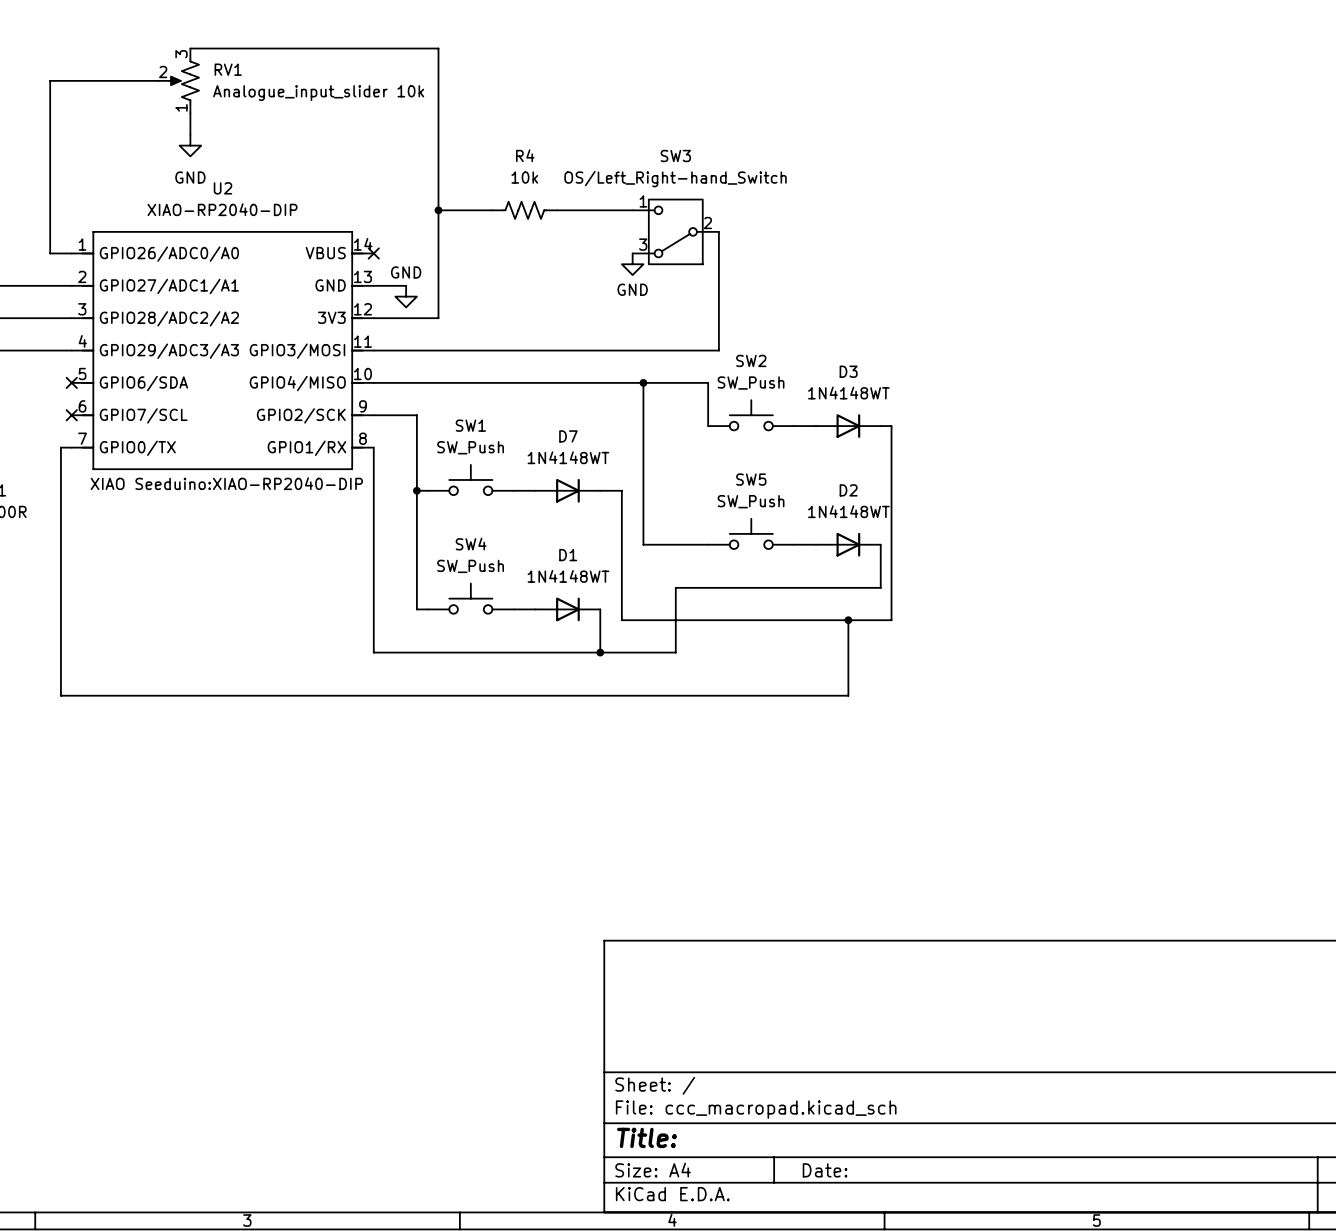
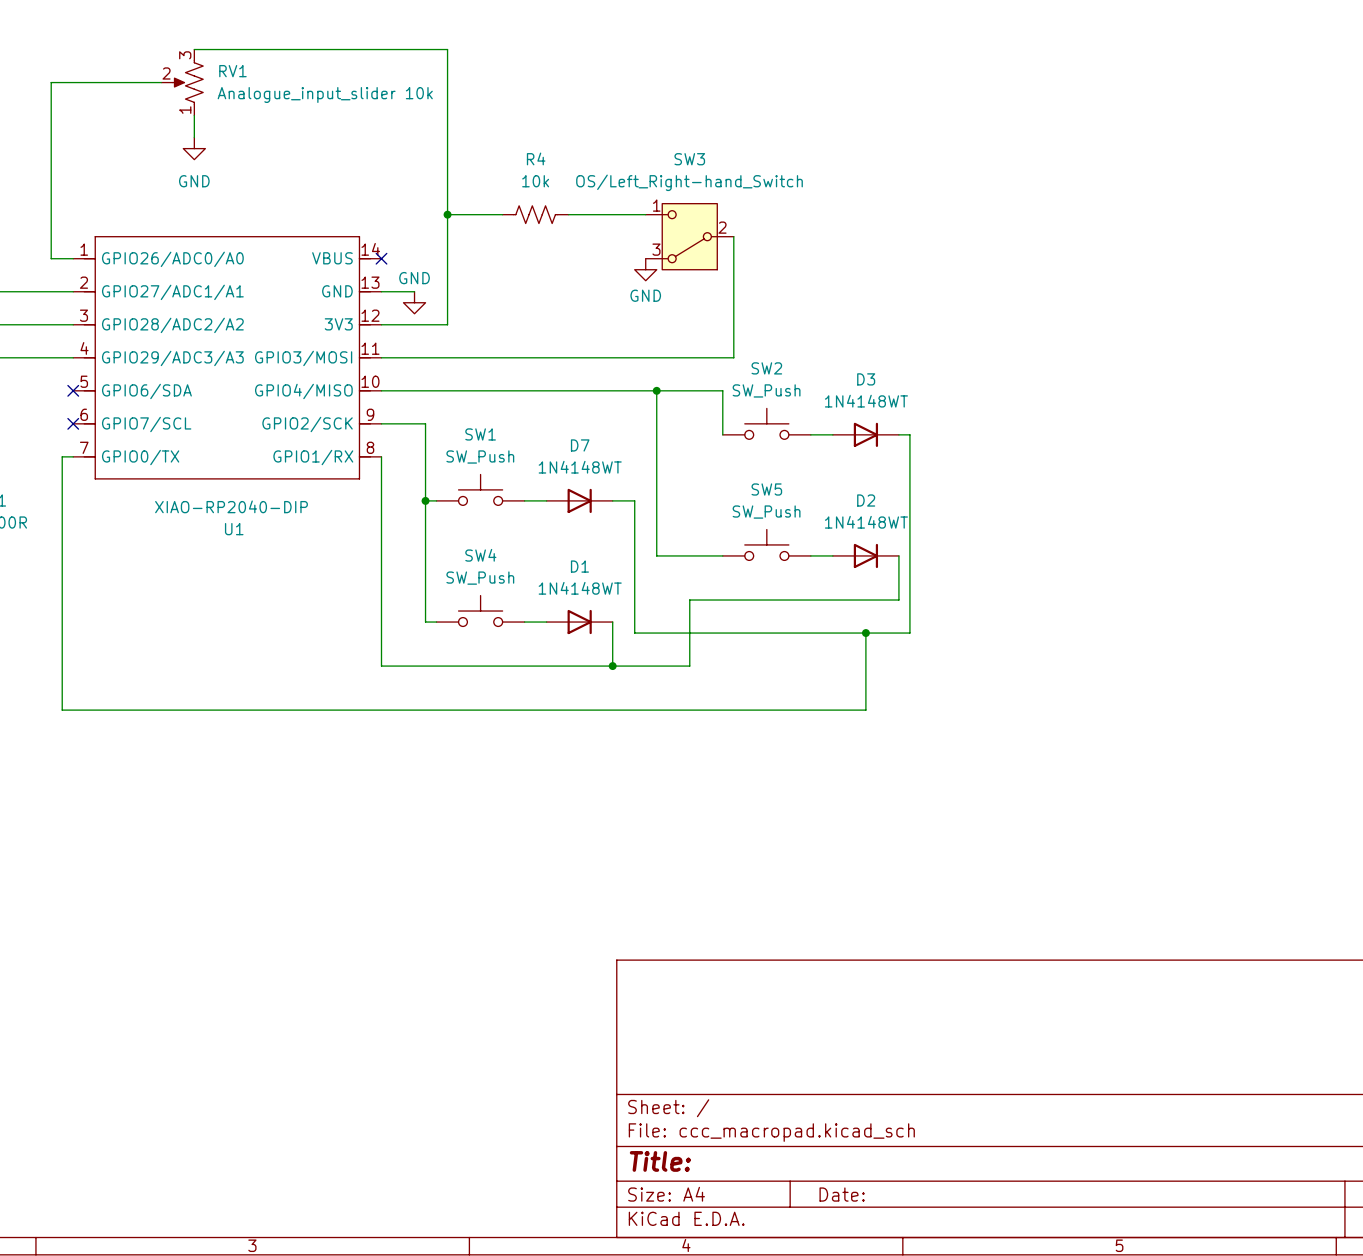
U2 name: U2 (223, 188) -> U1 (234, 529)
U2 value position: XIAO-RP2040-DIP (222, 209) -> XIAO-RP2040-DIP (231, 506)
U2 text: XIAO Seeduino:XIAO-RP2040-DIP (226, 483) -> none

